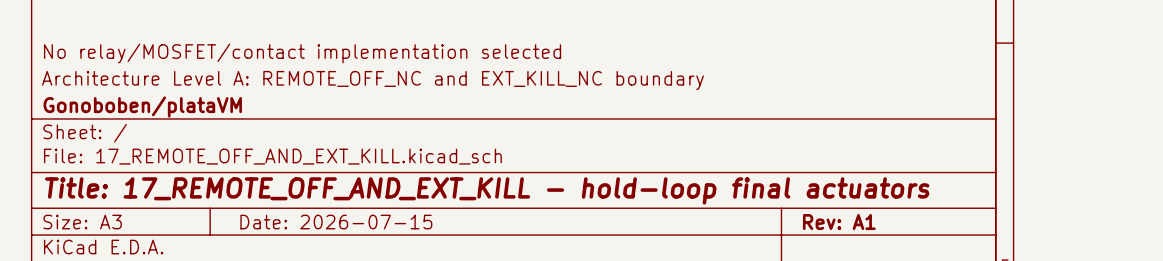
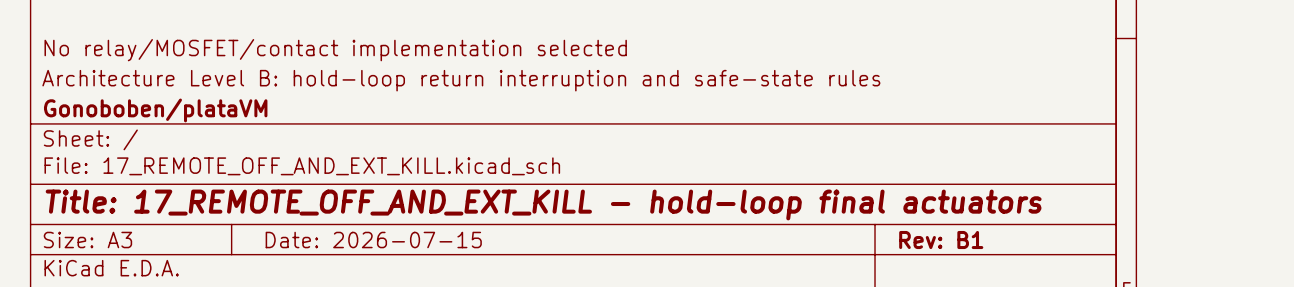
title block: Architecture Level A: REMOTE_OFF_NC and EXT_KILL_NC boundary (373, 80) -> Architecture Level B: hold-loop return interruption and safe-state rules (461, 80)
title block: Rev: A1 (839, 222) -> Rev: B1 (941, 240)

